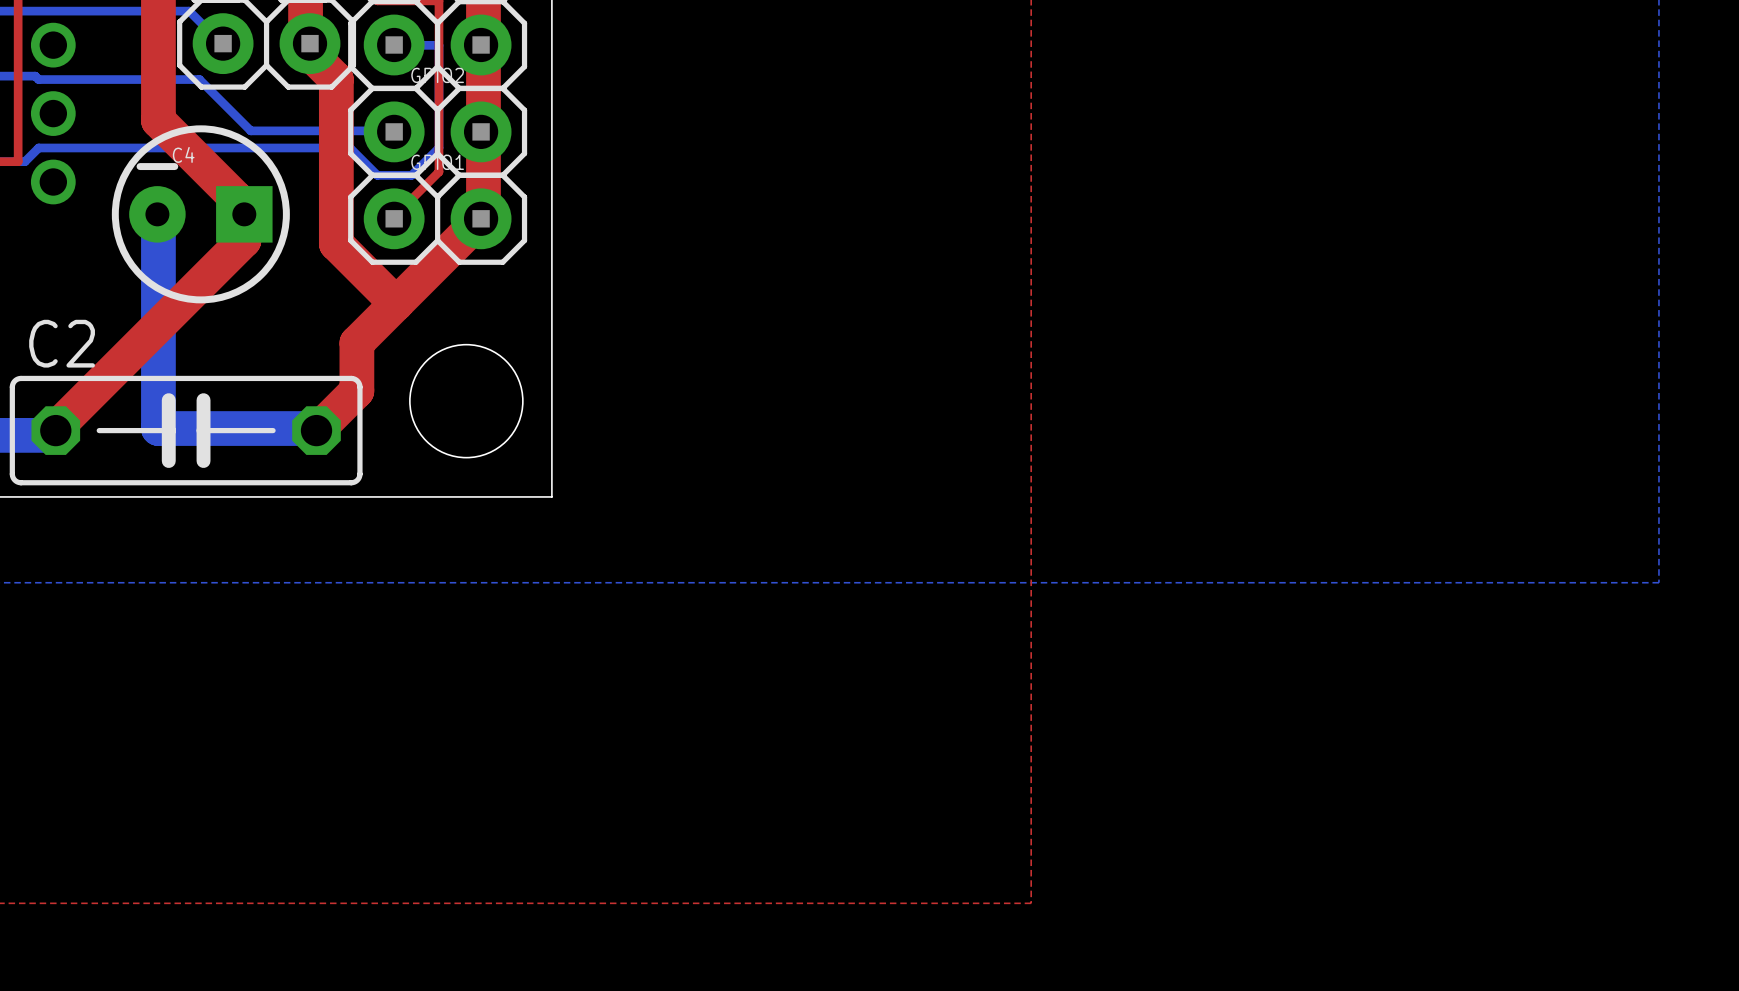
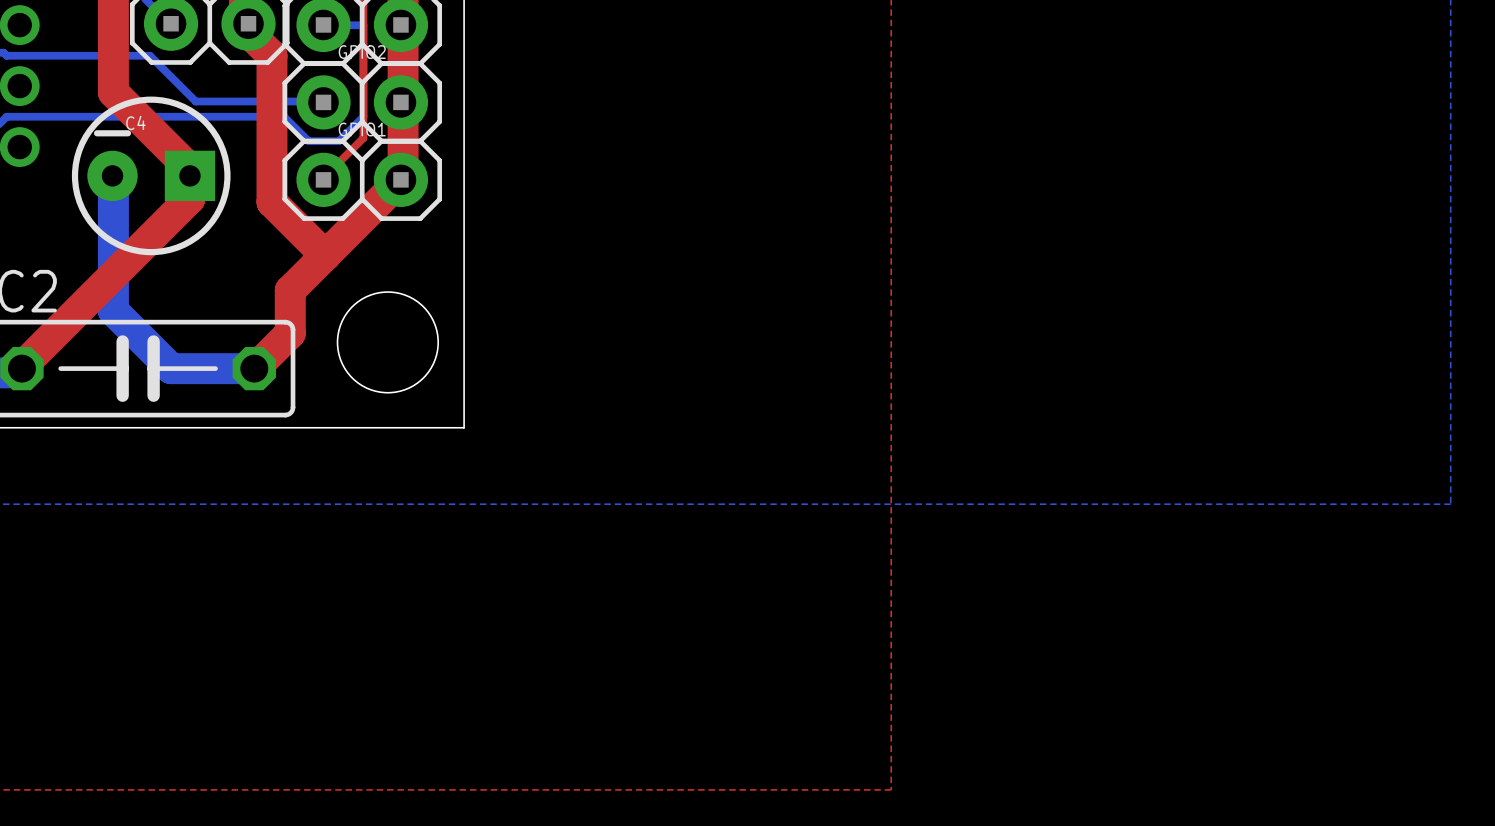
bottom track: (158, 365) (158, 428) (315, 428) -> (113, 310) (171, 368) (254, 368)

